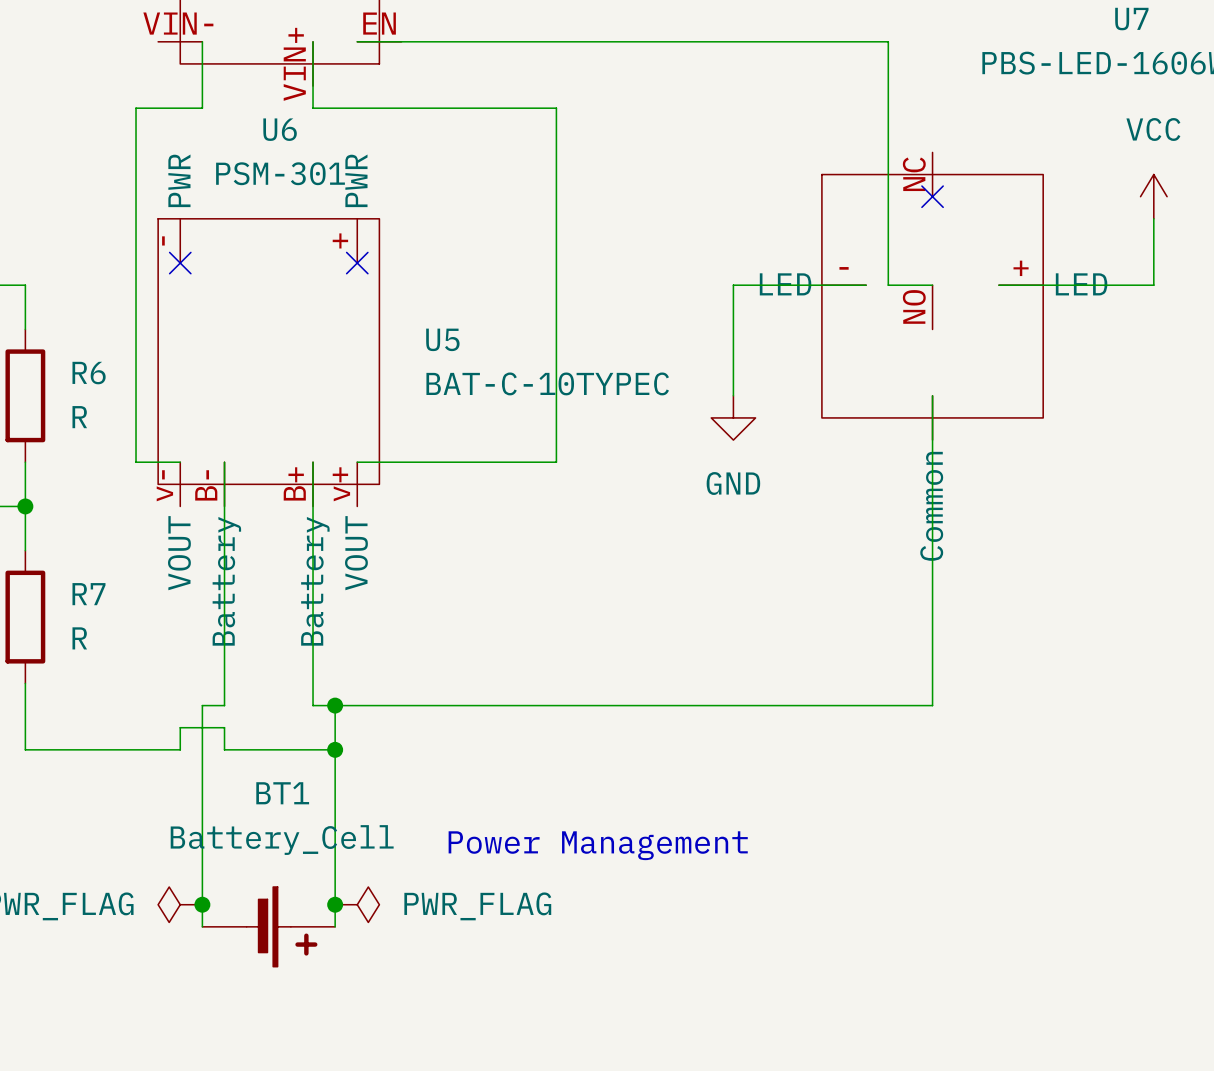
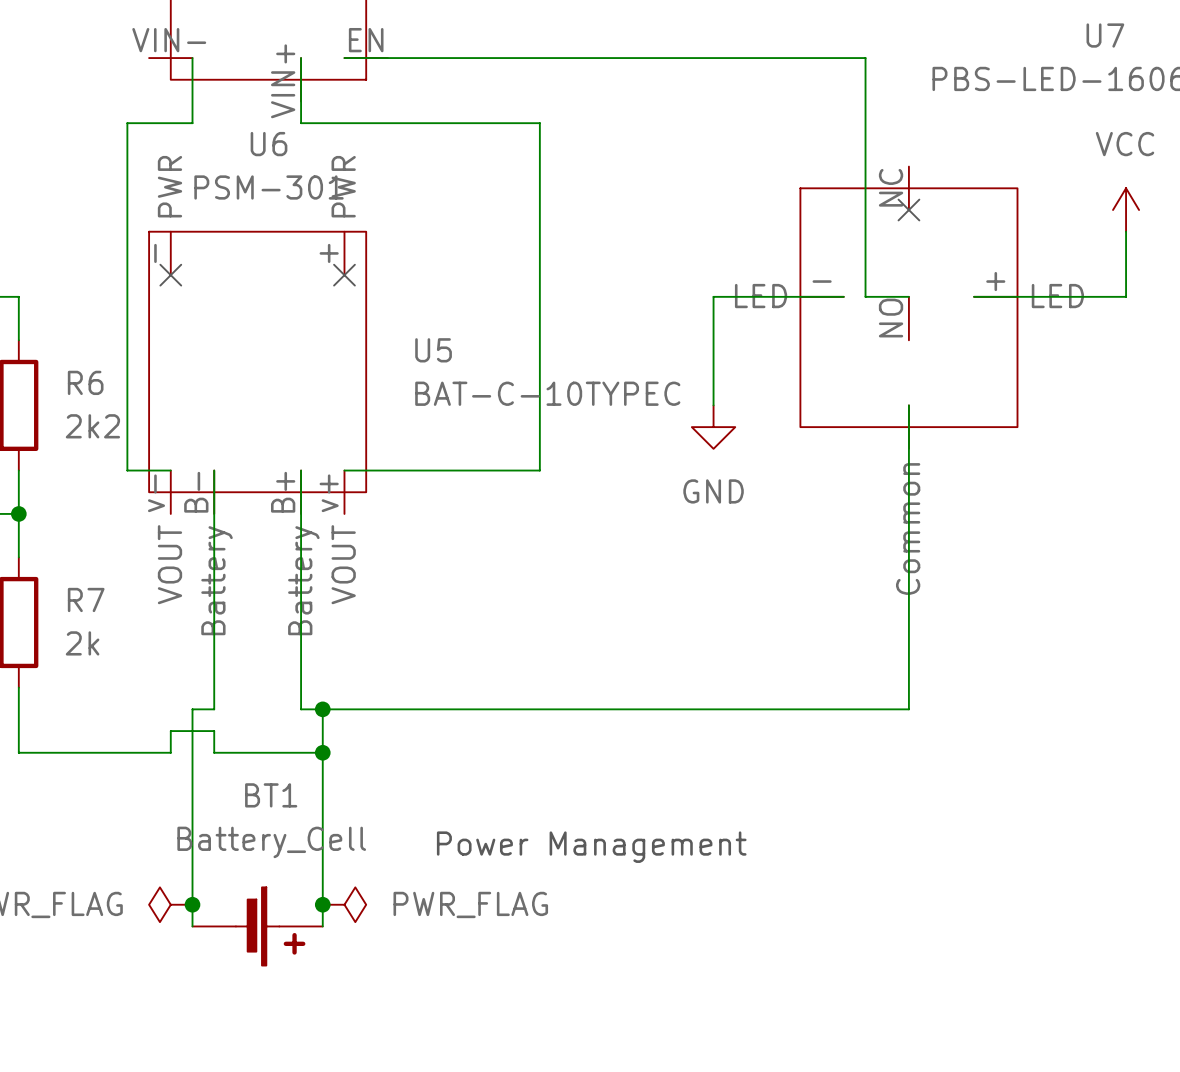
R6 value: R (79, 417) -> 2k2 (92, 426)
R7 value: R (79, 638) -> 2k (82, 643)

